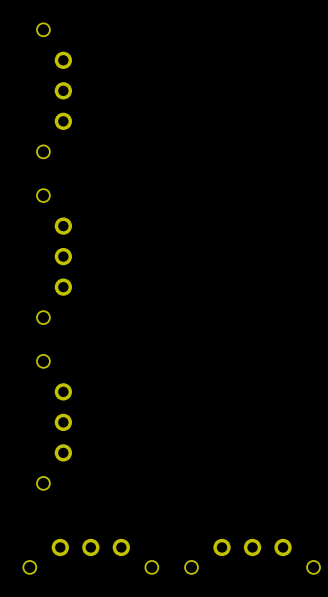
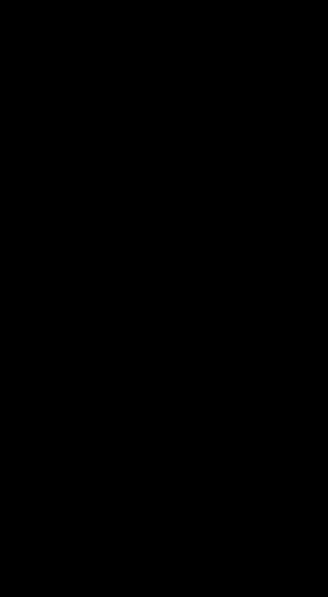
part: (54, 90) -> none
part: (54, 256) -> none
part: (54, 422) -> none
part: (90, 556) -> none
part: (252, 556) -> none

